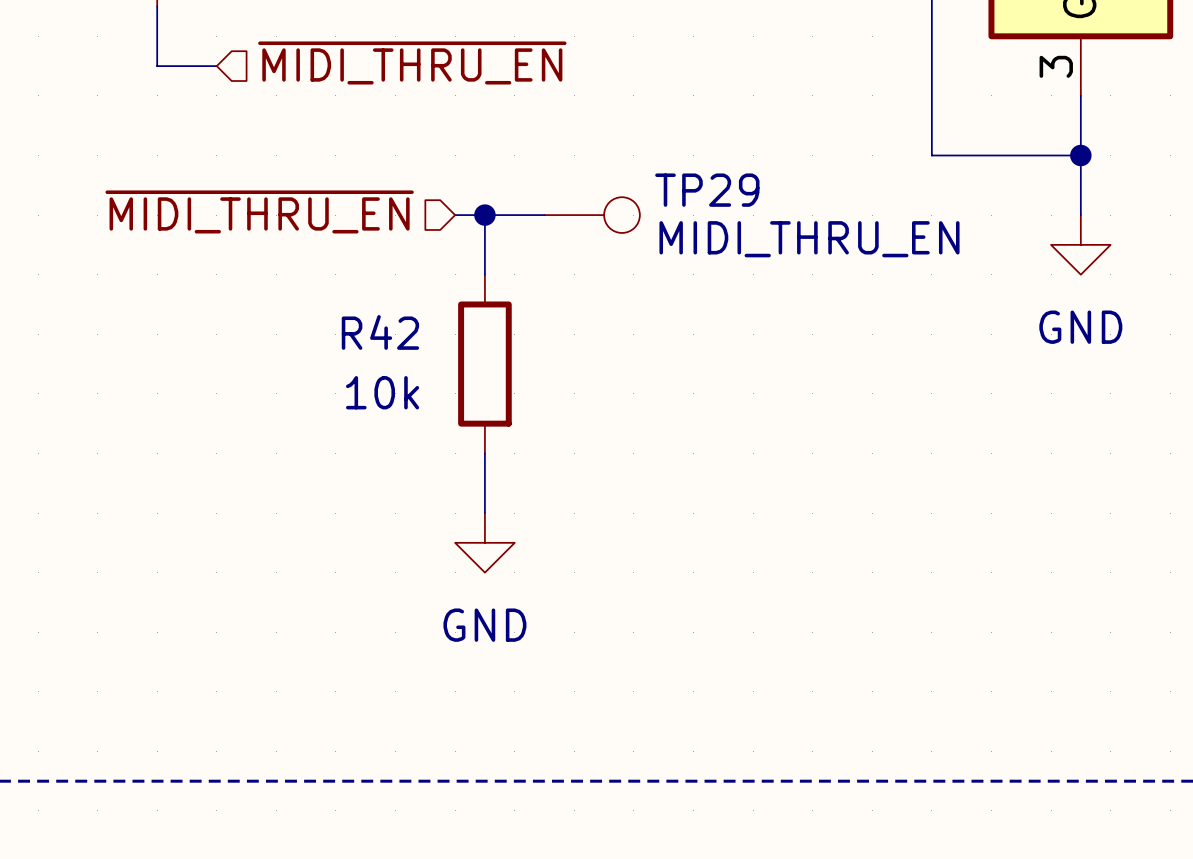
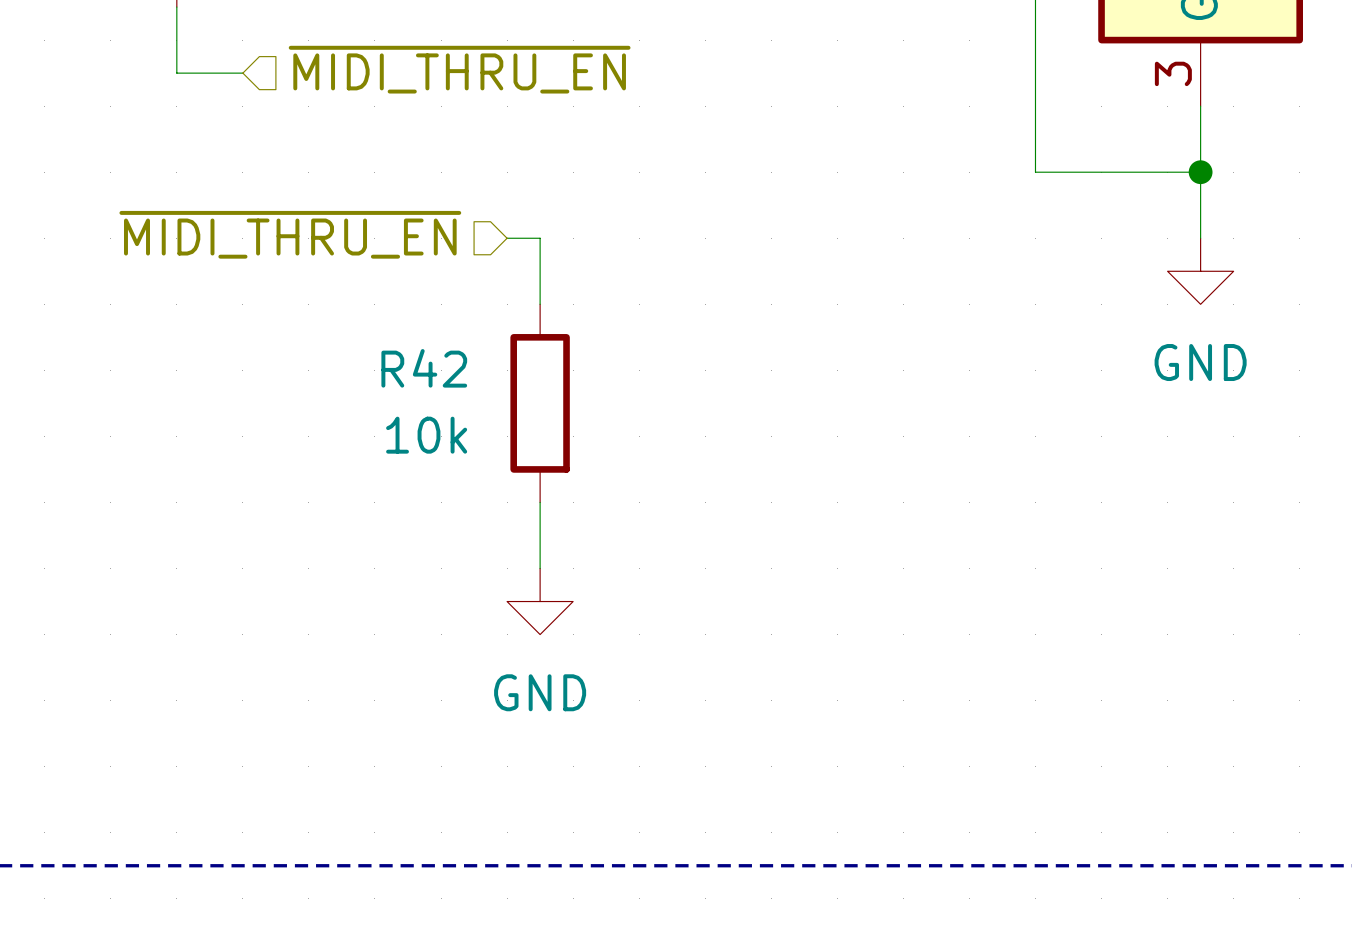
wire: (484, 215) (544, 215) -> none
junction: (484, 215) -> none
TP29: MIDI_THRU_EN (592, 215) -> none

